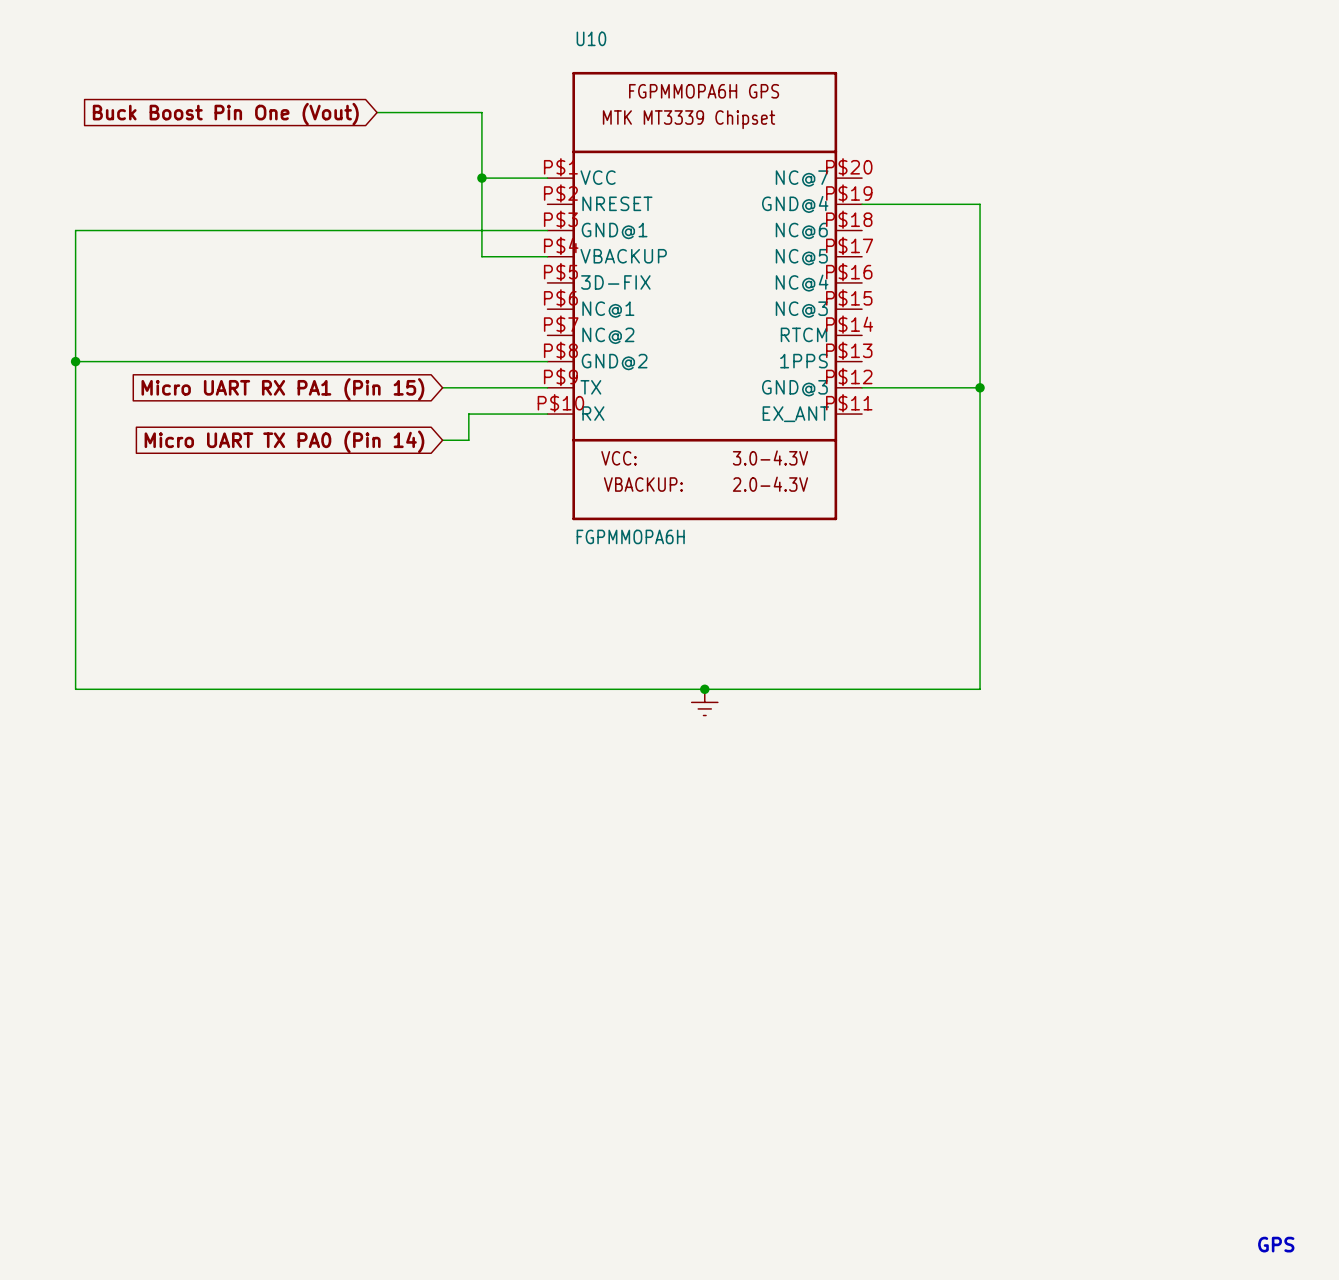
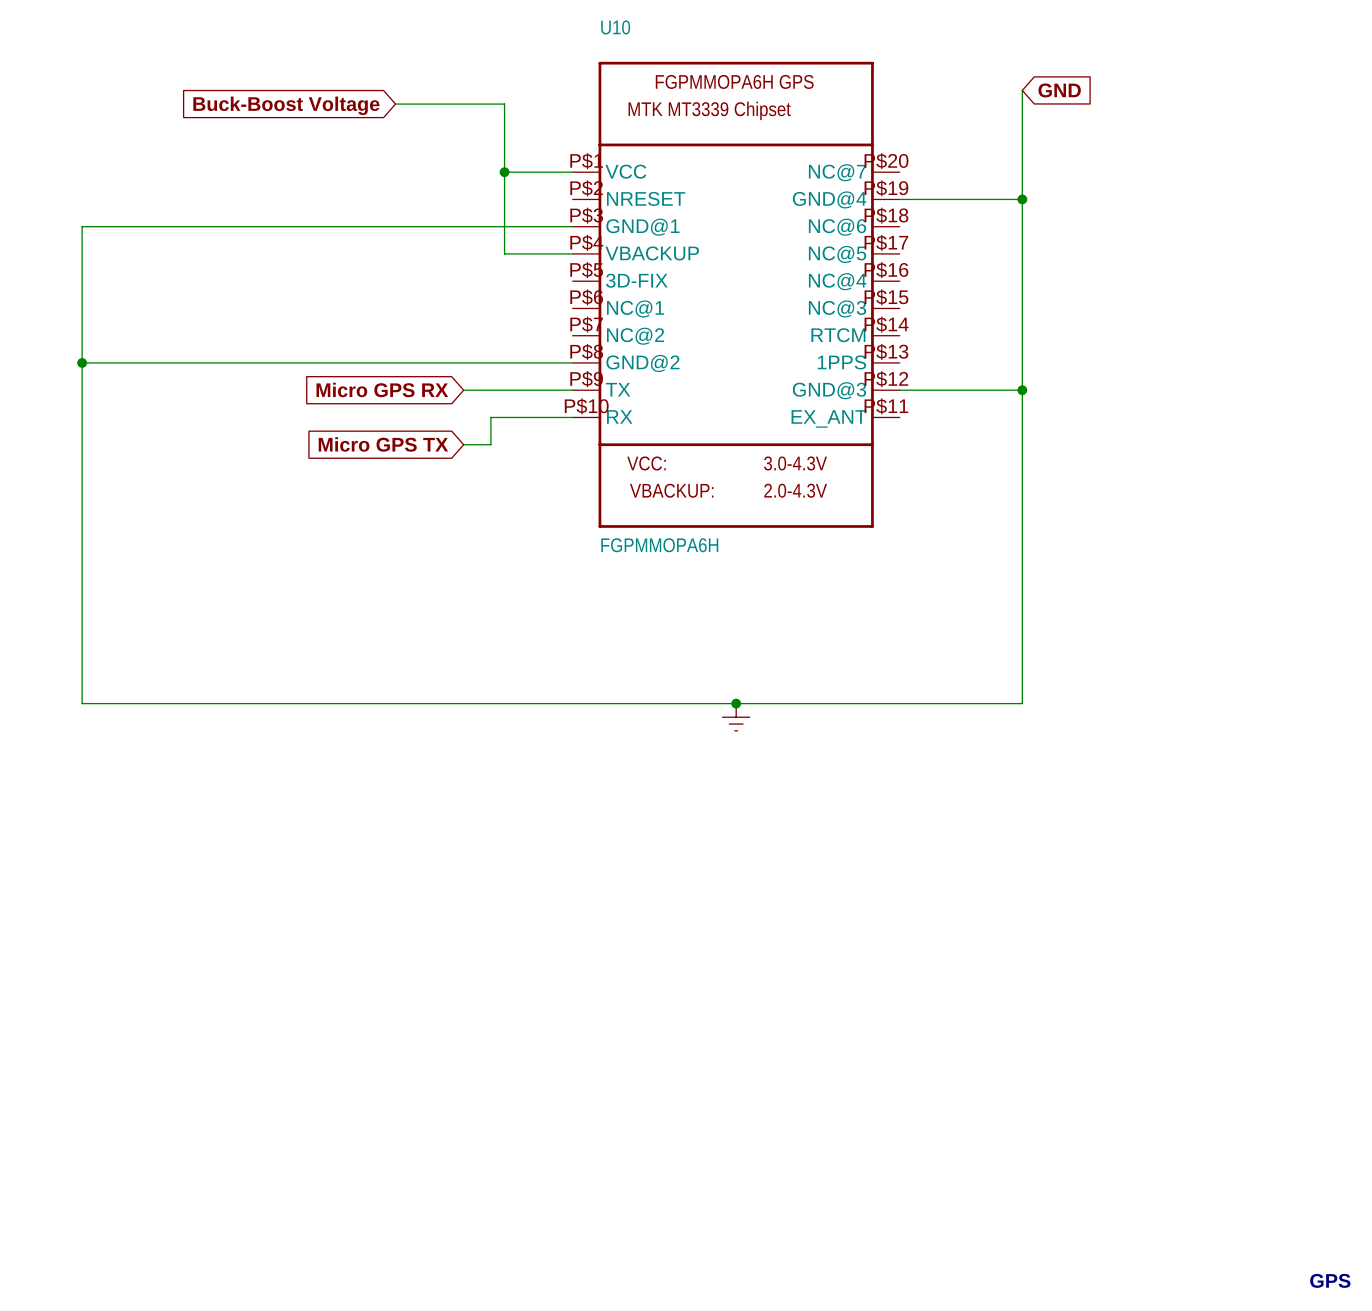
wire: none -> (1022, 90) (1022, 199)
global label: none -> GND (1059, 90)
global label: Buck Boost Pin One (Vout) (225, 114) -> Buck-Boost Voltage (286, 105)
junction: none -> (1022, 199)
global label: Micro UART RX PA1 (Pin 15) (282, 389) -> Micro GPS RX (382, 389)
global label: Micro UART TX PA0 (Pin 14) (284, 441) -> Micro GPS TX (383, 444)

